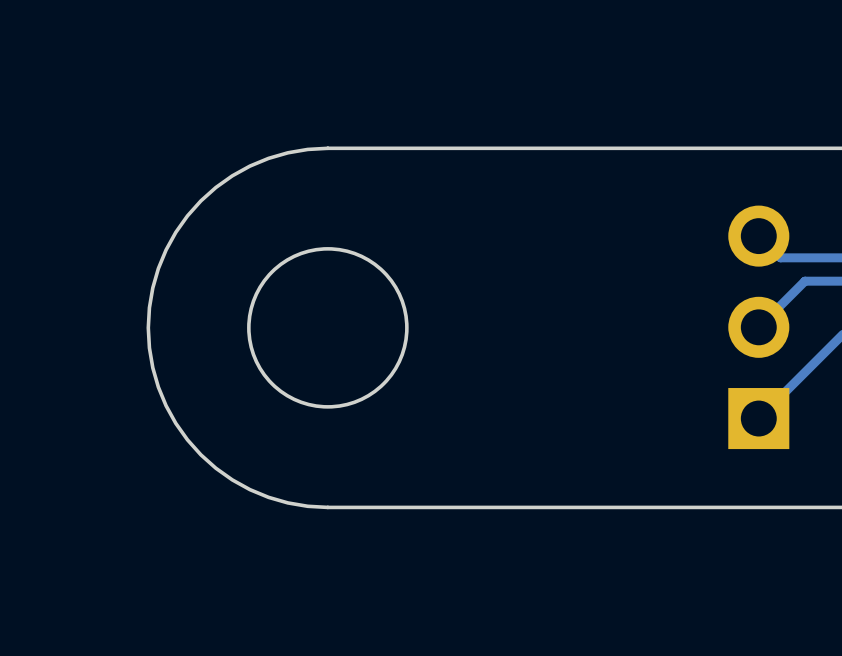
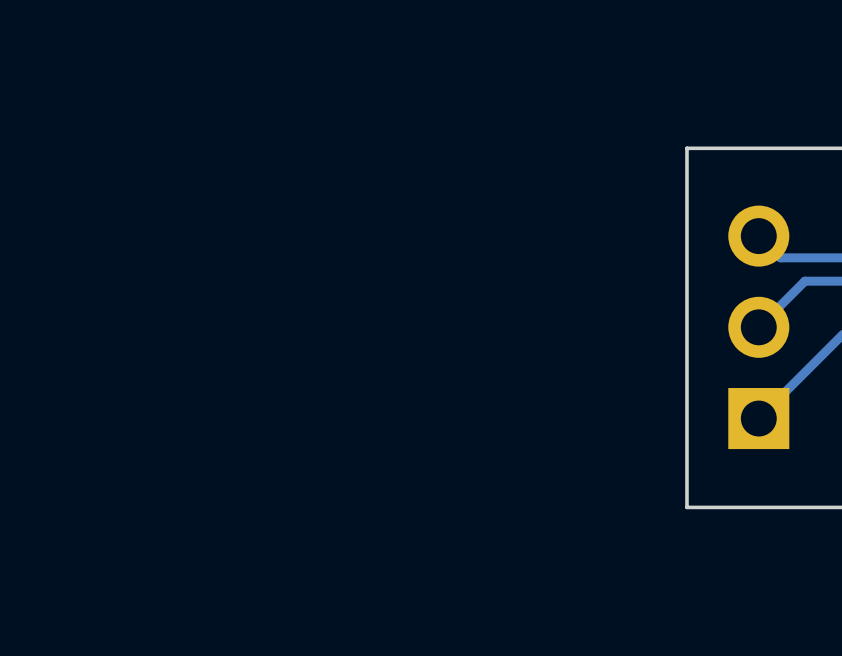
board edge: (686, 148) (327, 148) (307, 149) (268, 158) (232, 175) (215, 187) (200, 200) (175, 232) (158, 268) (149, 307) (148, 327) (149, 347) (158, 387) (175, 423) (200, 454) (215, 468) (232, 479) (268, 497) (307, 506) (327, 507) (686, 507) -> (686, 148) (686, 507)
round board edge: [247, 247, 409, 409] -> none

